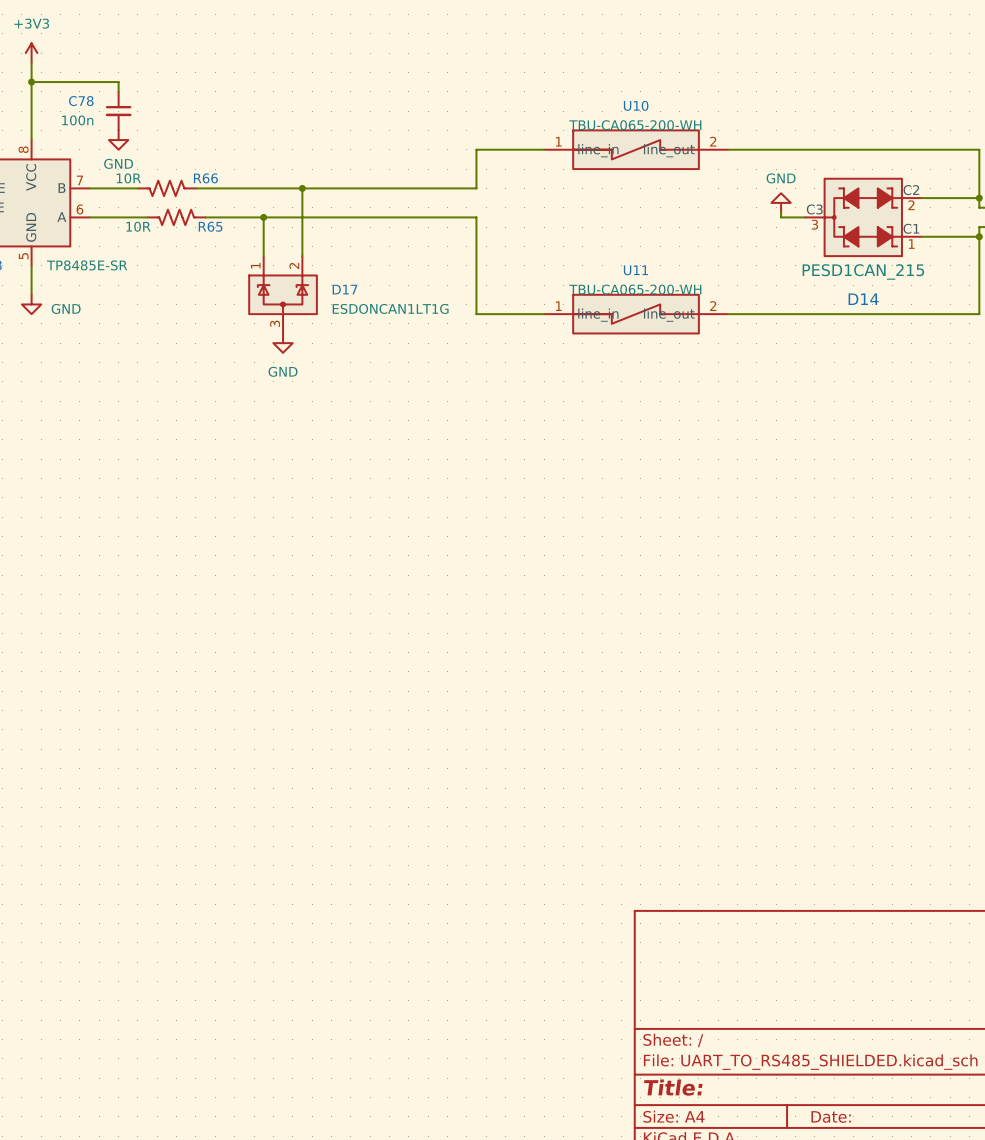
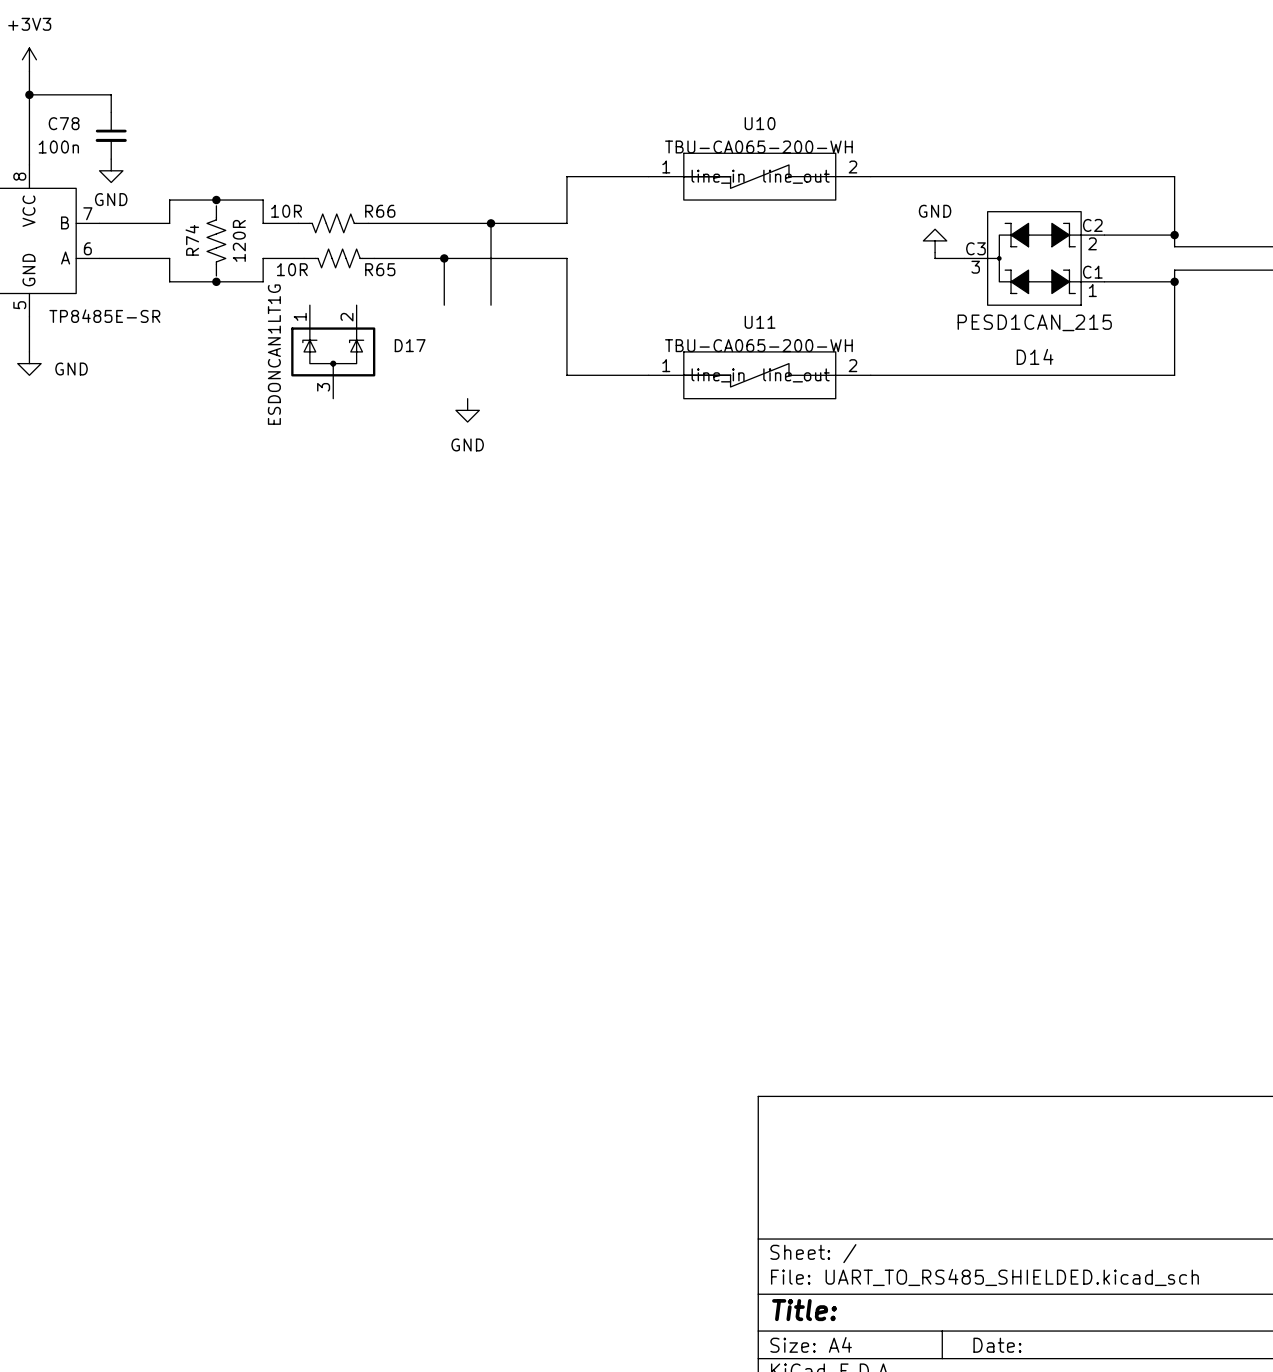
wire: (99, 82) (118, 82) (118, 91) -> (111, 94) (111, 112)
C78 position: (118, 111) -> (111, 135)
power symbol position: GND (118, 140) -> GND (111, 170)
junction: none -> (216, 200)
R66 position: (166, 188) -> (333, 223)
wire: (195, 188) (225, 188) -> (157, 223) (169, 223) (169, 200) (263, 200) (263, 223)
wire: (302, 188) (302, 256) -> (491, 223) (491, 305)
junction: (302, 188) -> none
junction: none -> (491, 223)
R74: none -> 120R (216, 240)
R65 position: (176, 217) -> (339, 258)
wire: (205, 217) (225, 217) -> (169, 258) (169, 281) (263, 281) (263, 258)
wire: (263, 217) (263, 256) -> (444, 258) (444, 305)
junction: (263, 217) -> none
junction: none -> (444, 258)
junction: none -> (216, 281)
D17 value rotation: 0° (390, 308) -> 90° counterclockwise (274, 354)
D17 value position: ESDONCAN1LT1G (390, 308) -> ESDONCAN1LT1G (274, 354)
power symbol position: GND (283, 343) -> GND (467, 410)

